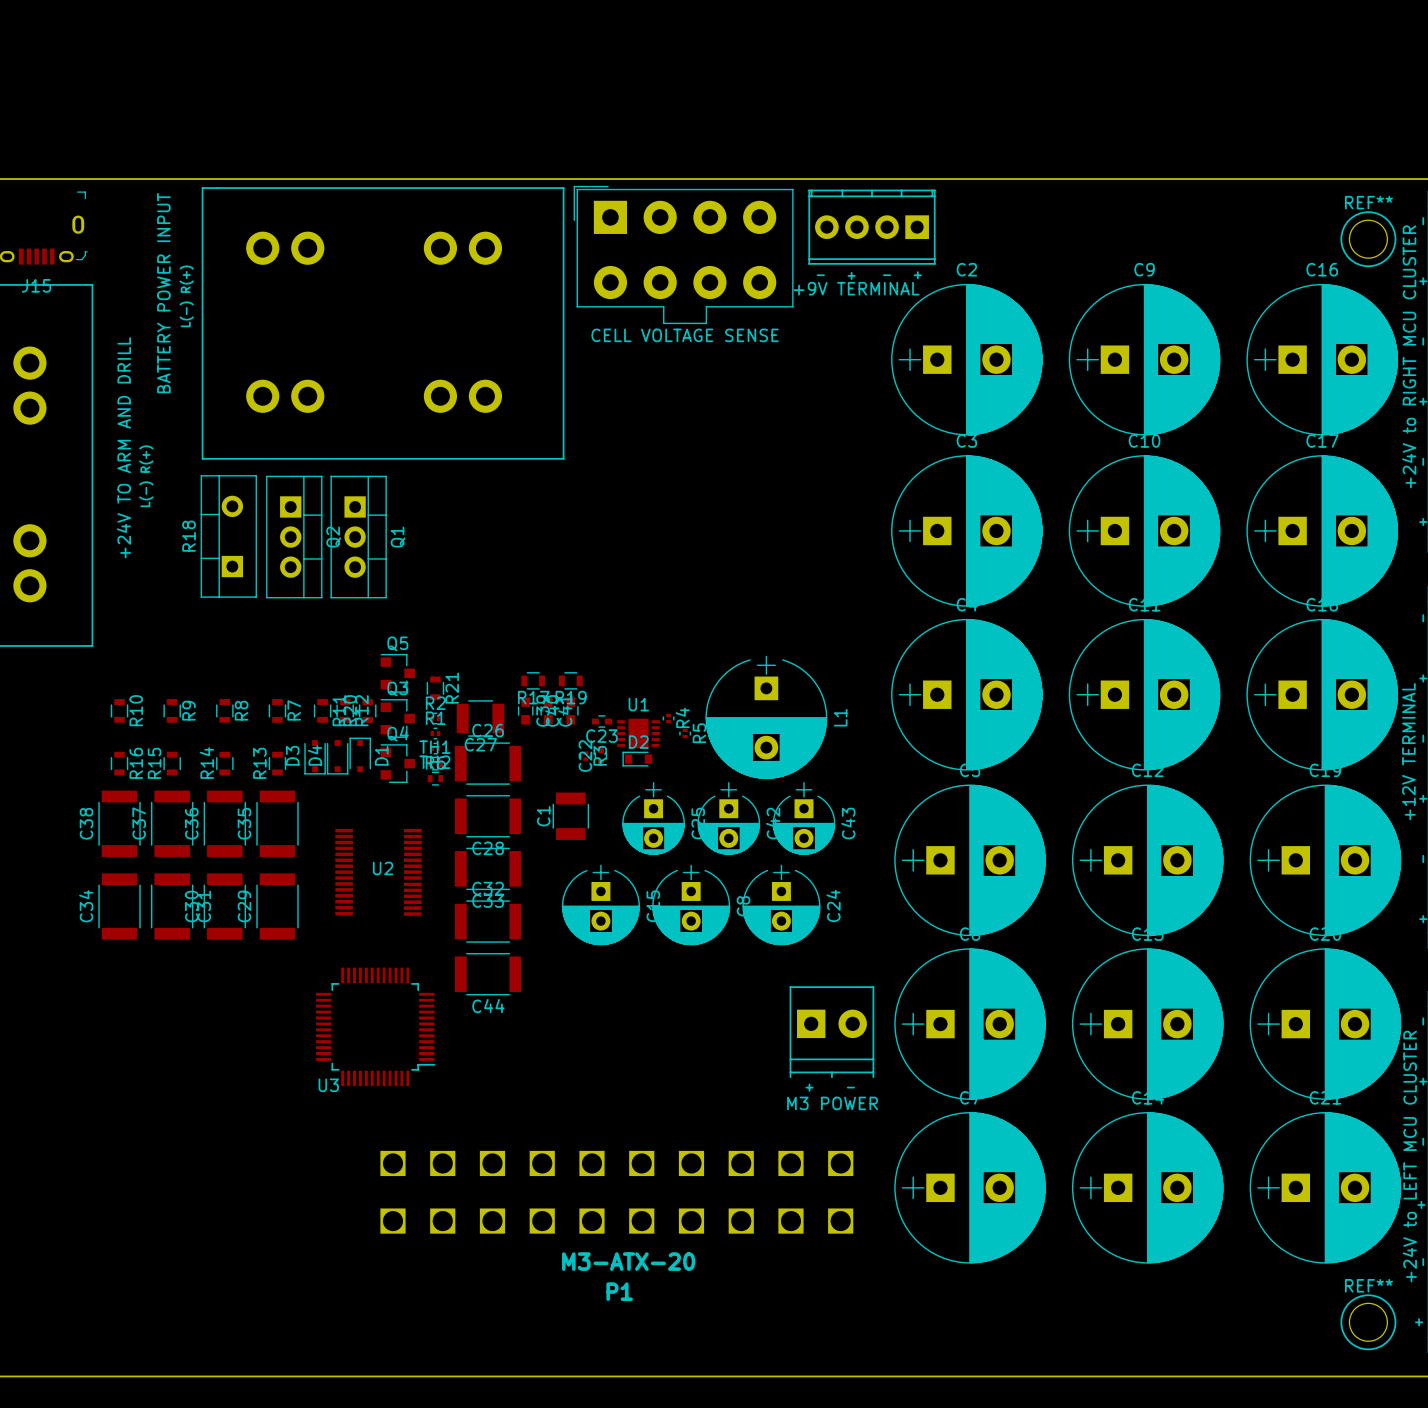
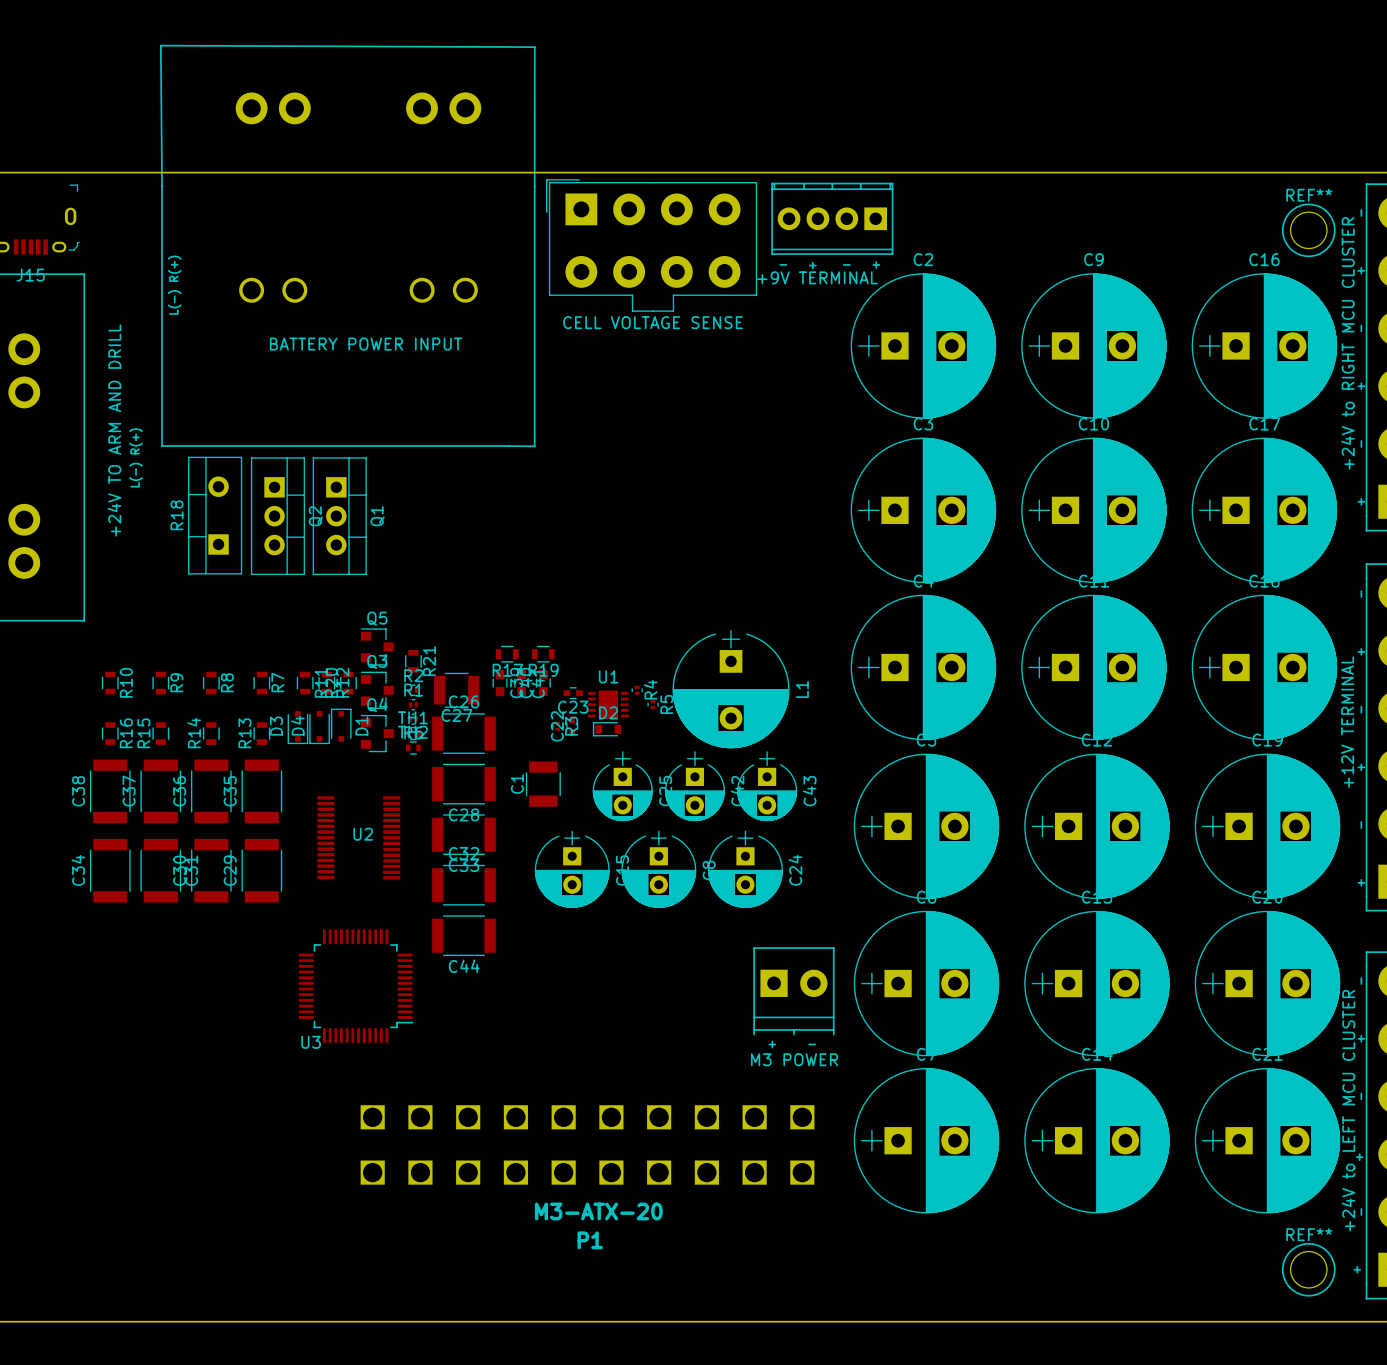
BATTERY POWER INPUT: none -> (347, 245)
BATTERY POWER INPUT: (383, 323) -> none

